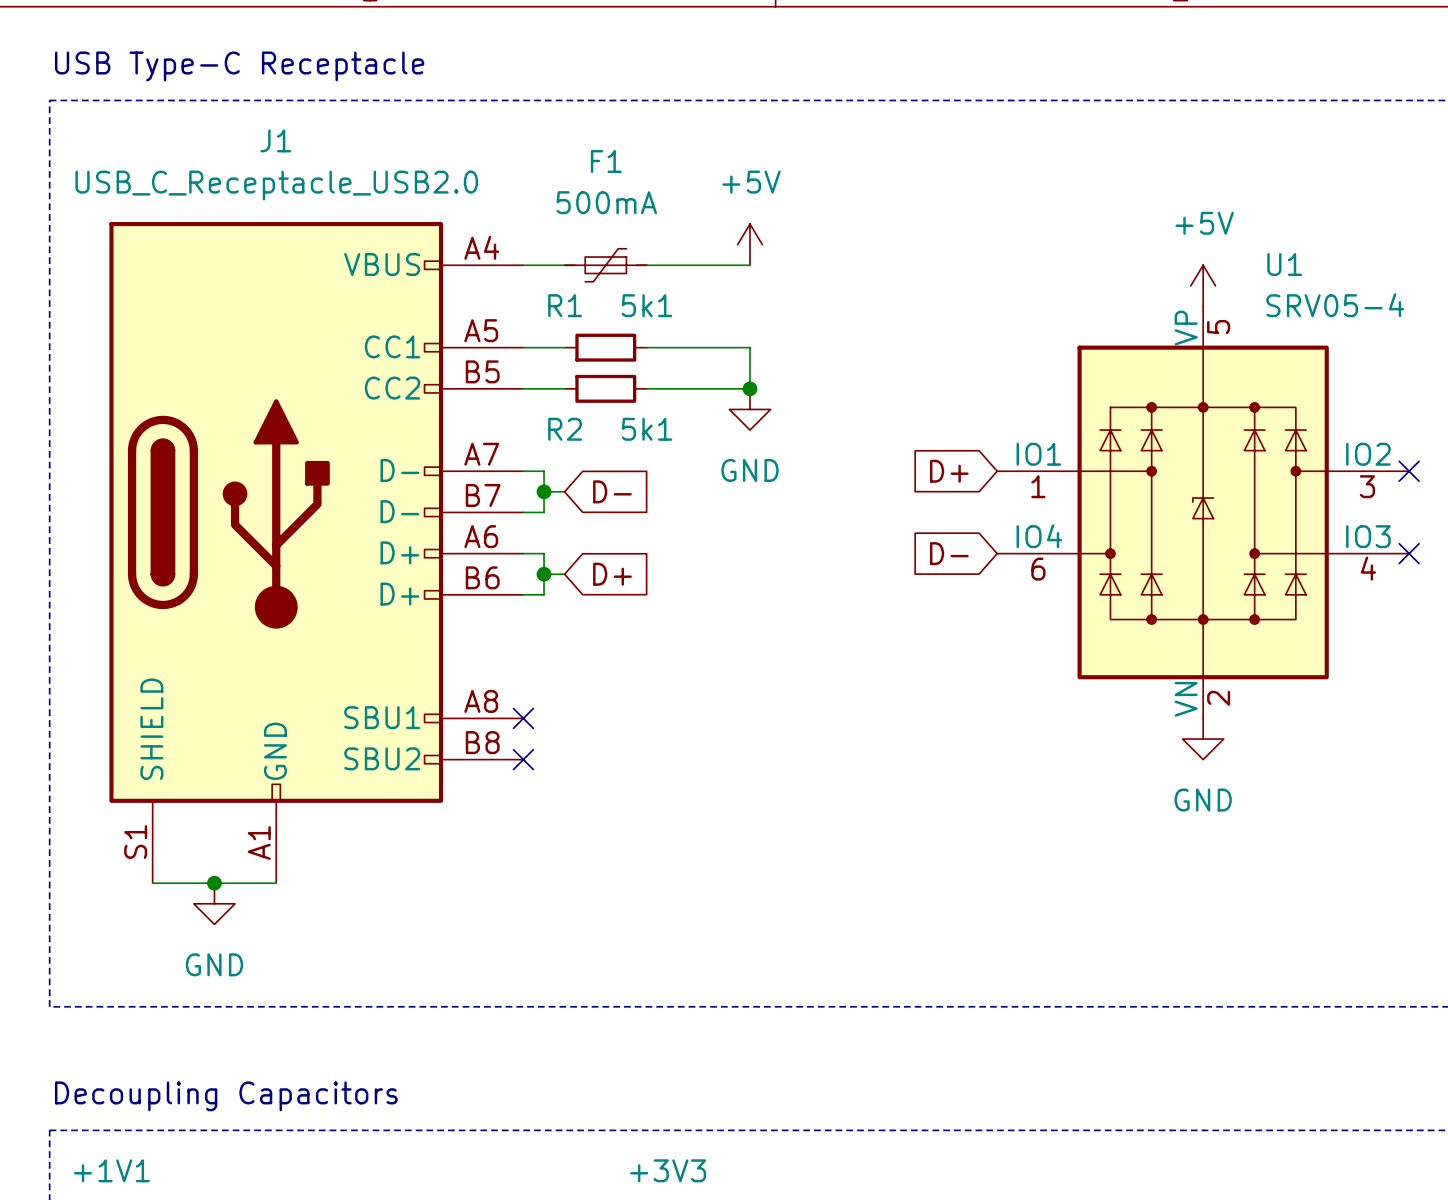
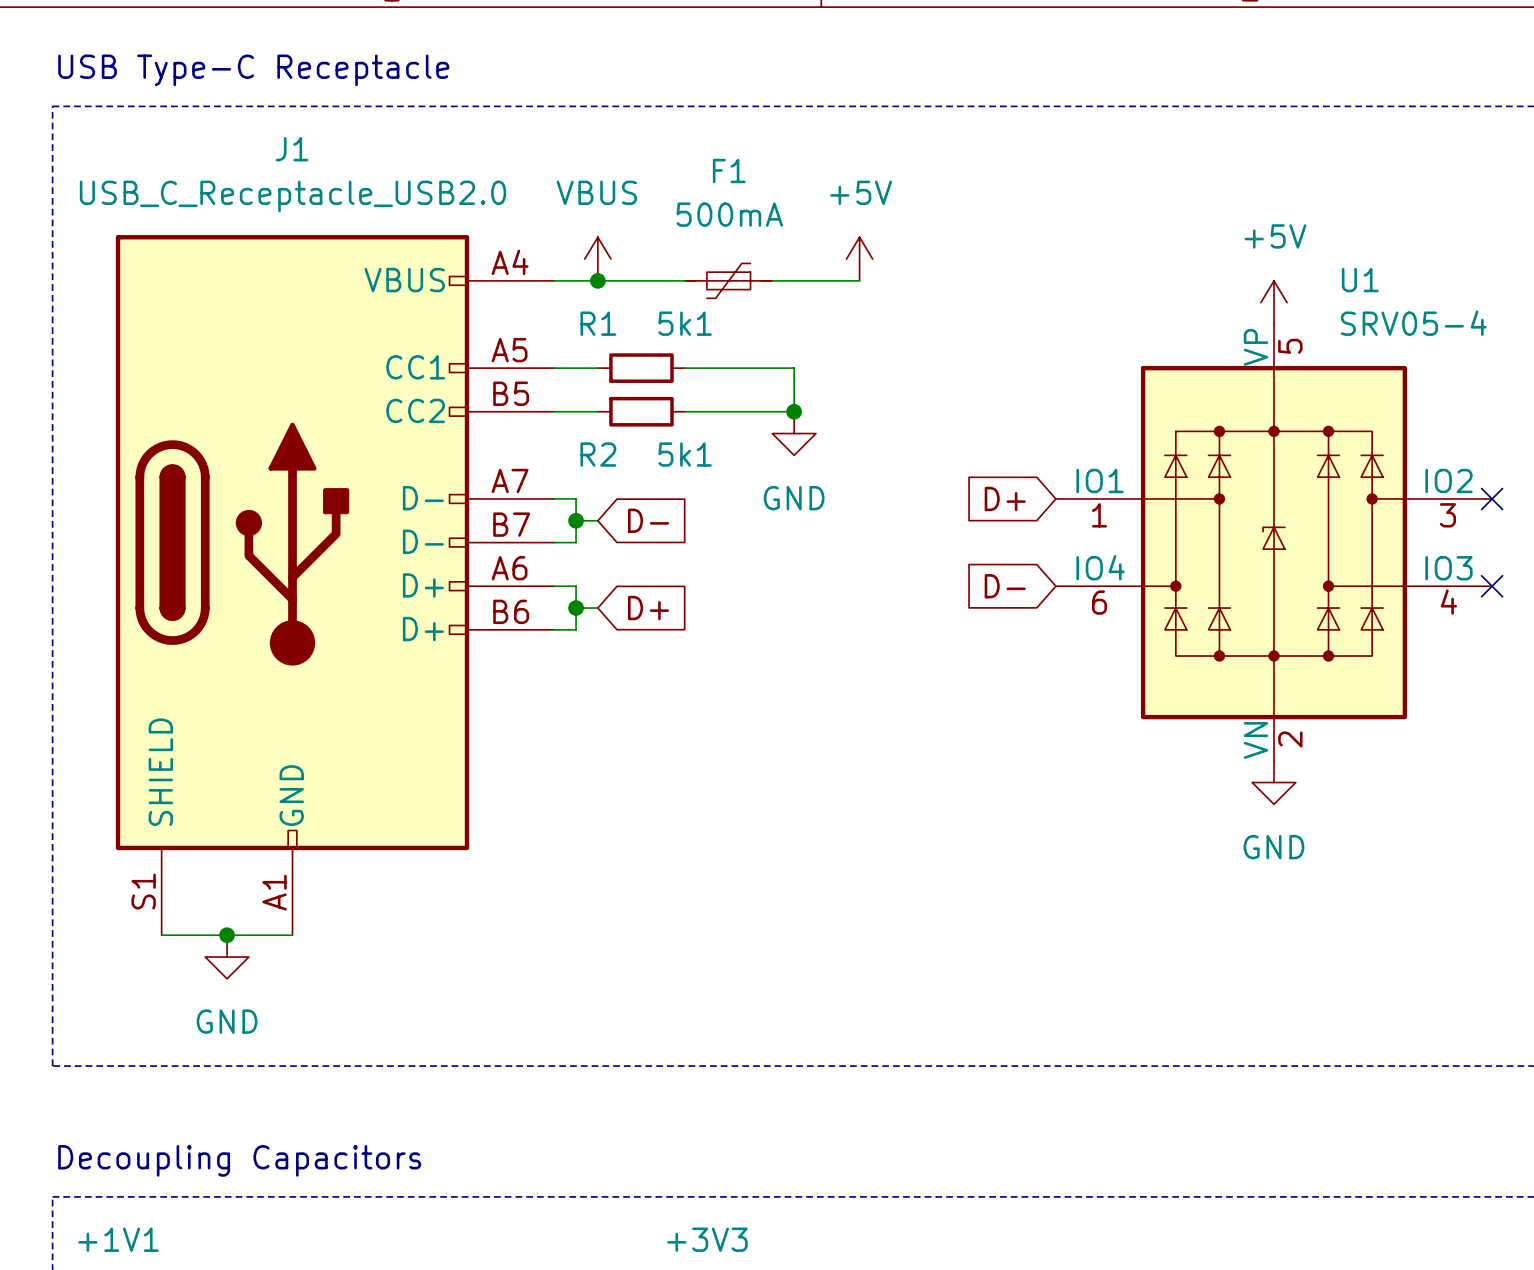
J1 symbol: [109, 222, 524, 884] -> [115, 235, 555, 936]
power symbol: none -> VBUS (597, 259)
power symbol position: +5V (750, 244) -> +5V (859, 259)
junction: none -> (597, 280)
F1 position: (605, 265) -> (728, 280)
wire: none -> (794, 280) (859, 280)
no-connect mark: (523, 718) -> none
no-connect mark: (523, 759) -> none

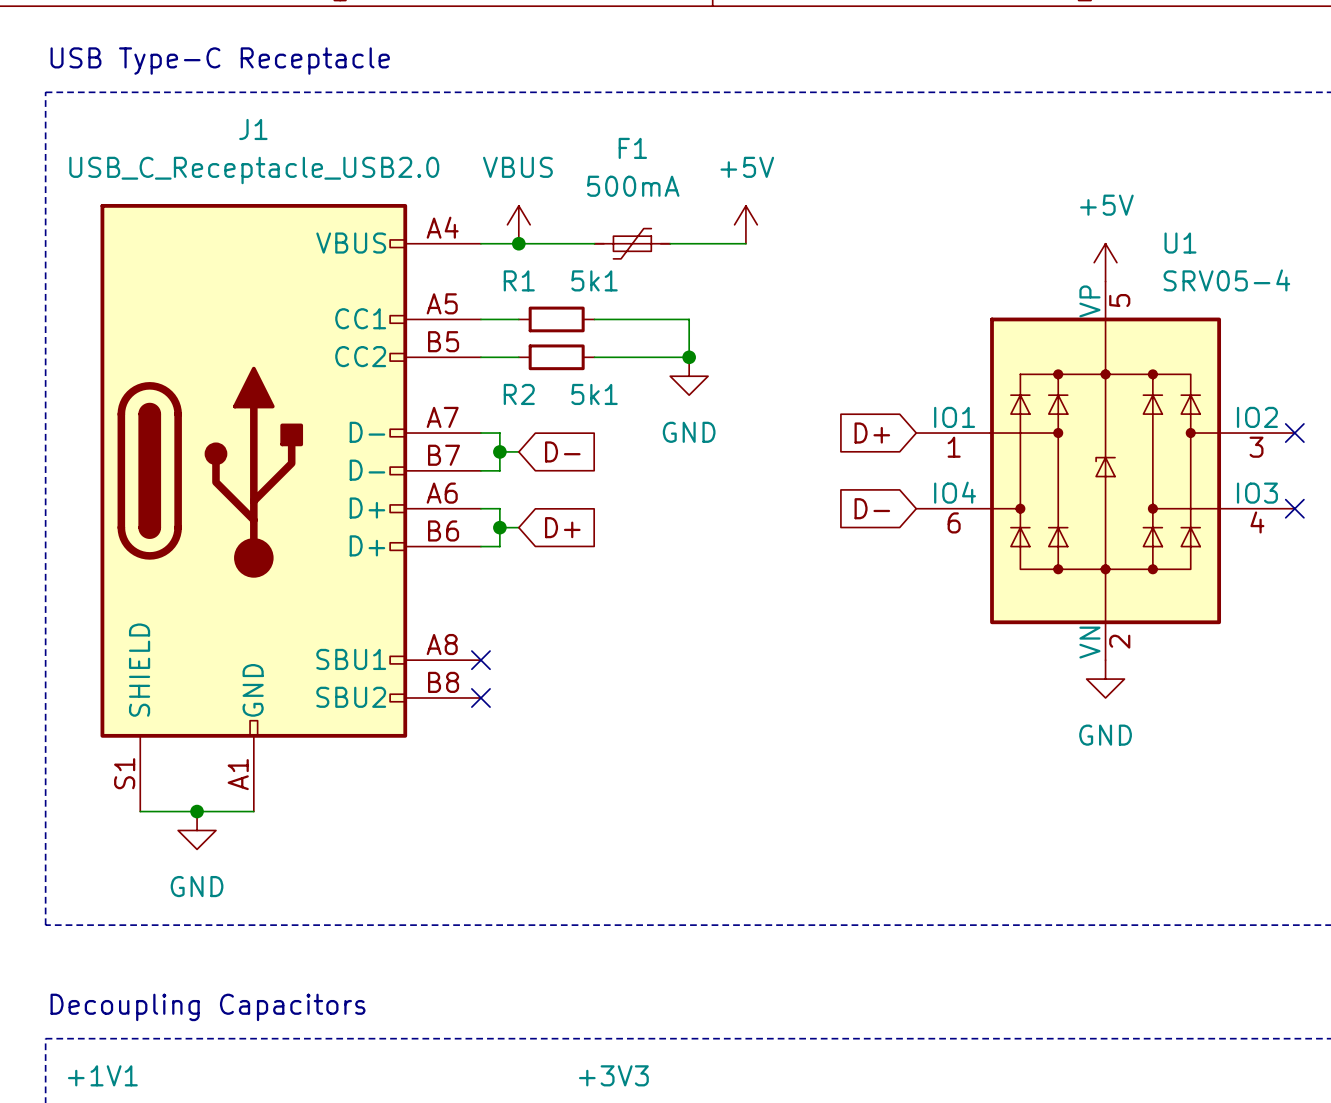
J1 symbol: [115, 235, 555, 936] -> [100, 203, 481, 812]
no-connect mark: none -> (480, 660)
no-connect mark: none -> (480, 697)

